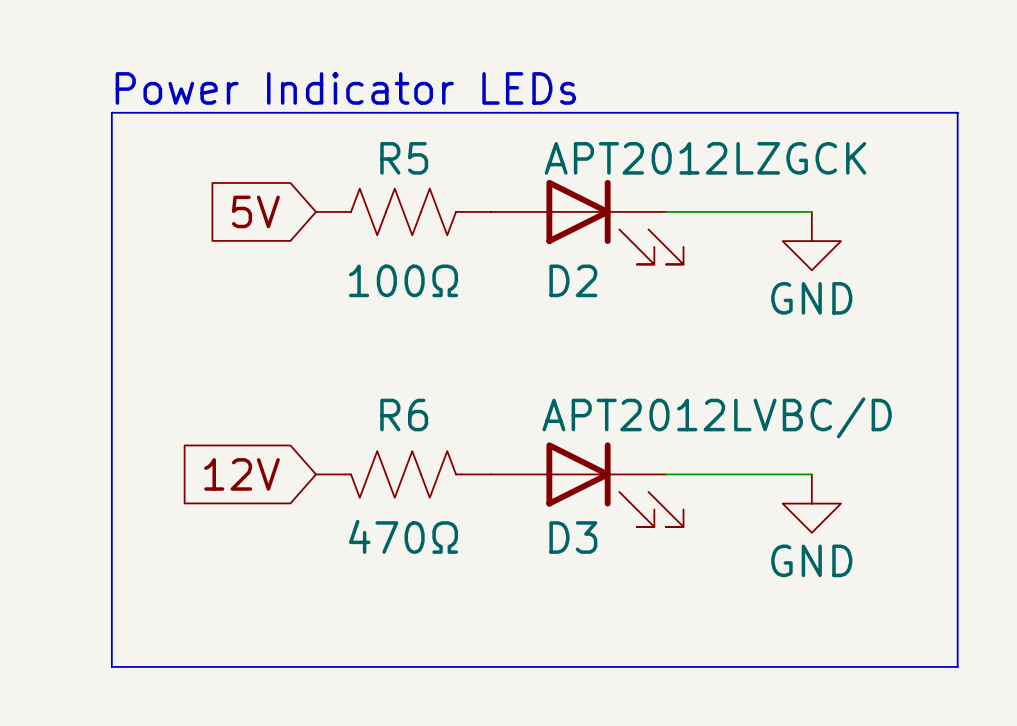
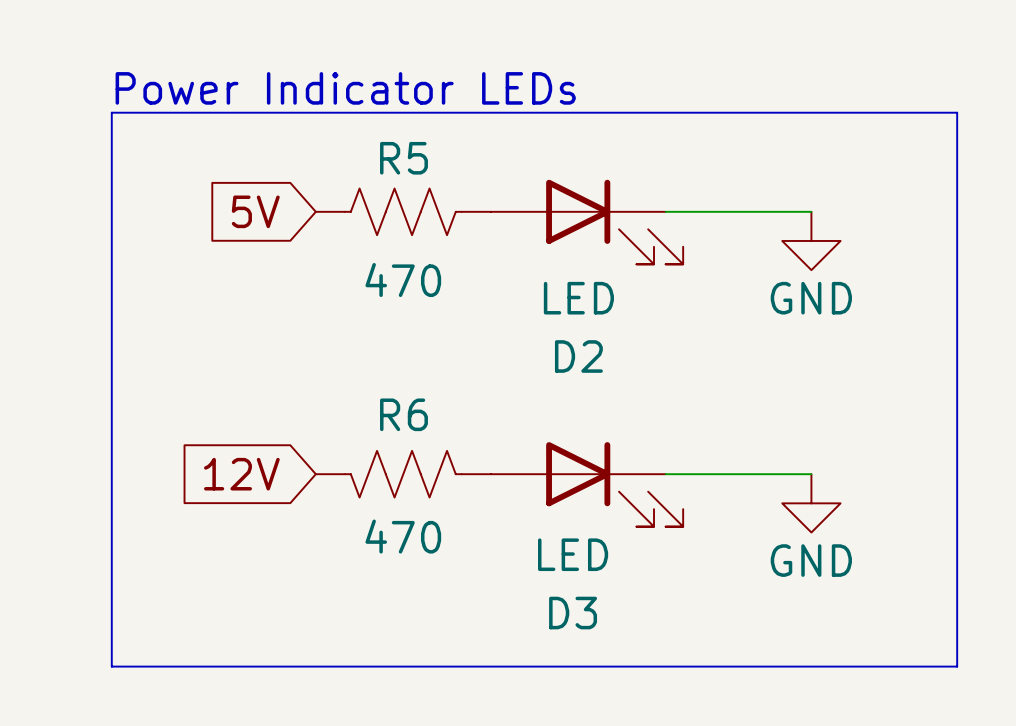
D2 value: APT2012LZGCK (705, 158) -> LED (578, 298)
R5 value: 100Ω (403, 280) -> 470 (403, 280)
D2 name position: D2 (573, 280) -> D2 (578, 356)
D3 value: APT2012LVBC/D (717, 417) -> LED (573, 554)
R6 value: 470Ω (403, 536) -> 470 (403, 536)
D3 name position: D3 (573, 537) -> D3 (573, 613)

